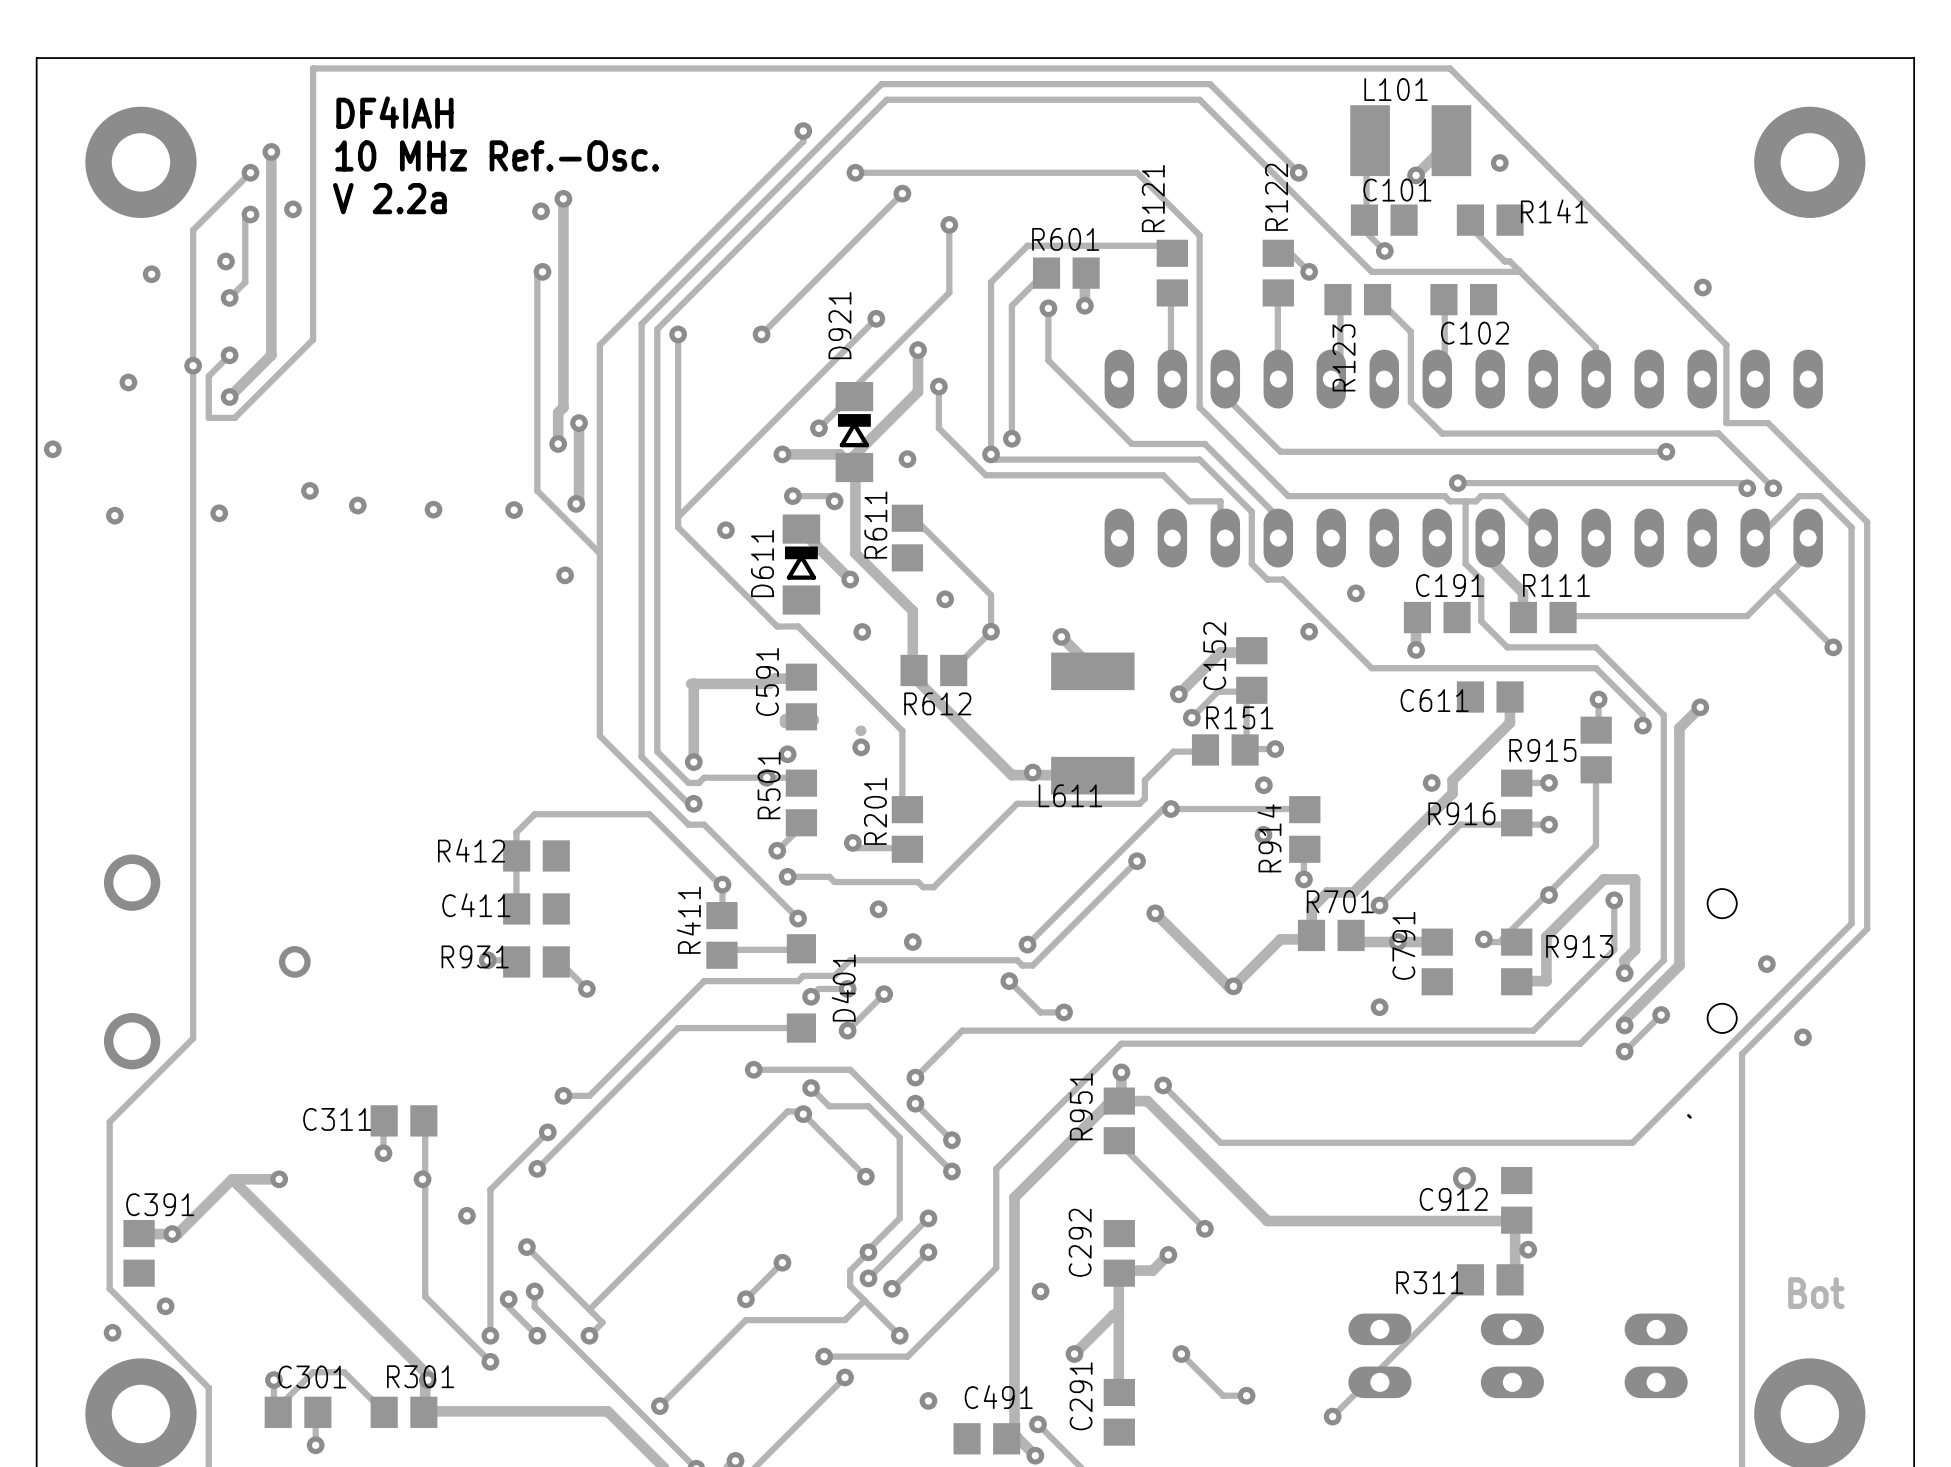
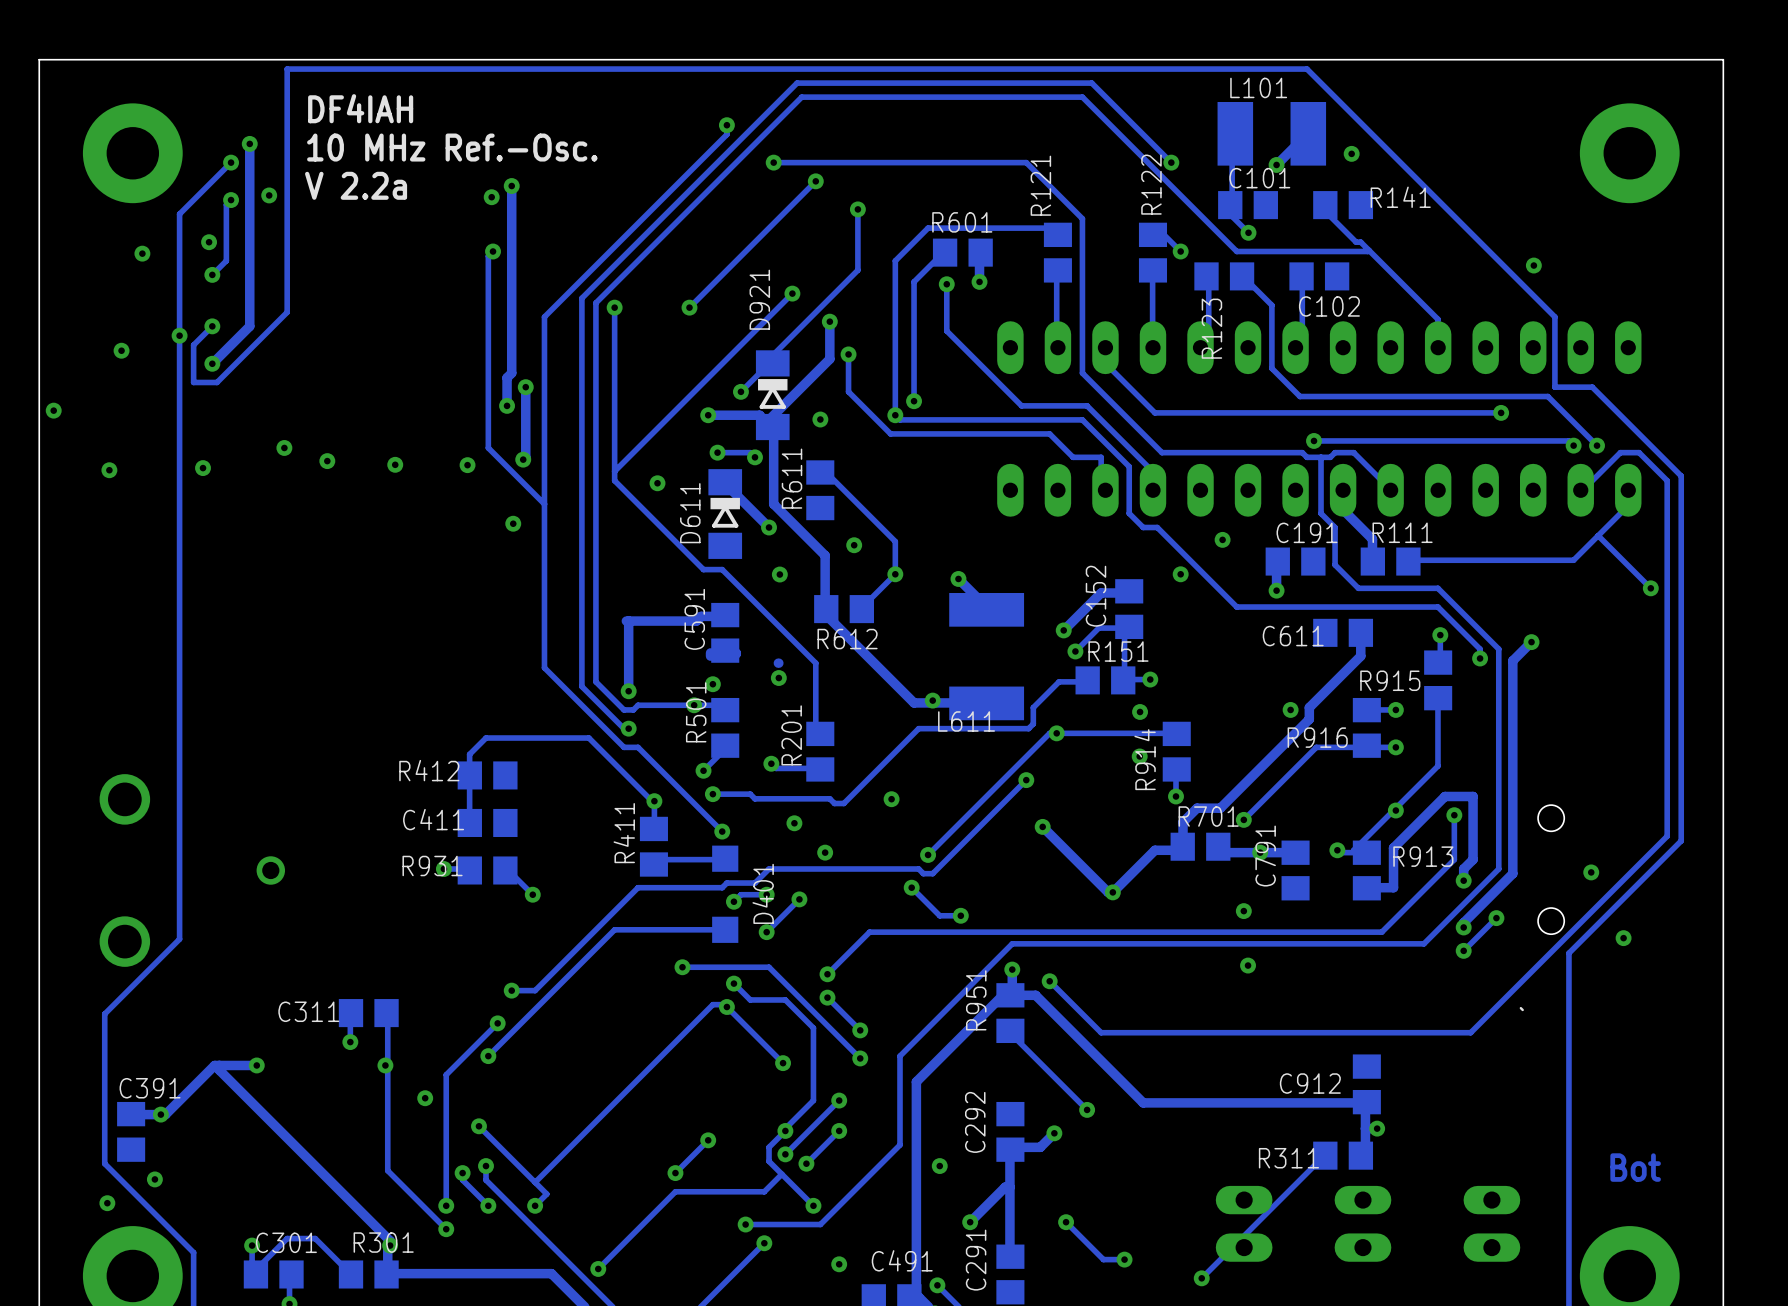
via: none -> (891, 799)
via: none -> (1248, 965)
via: (1464, 1178) -> none

